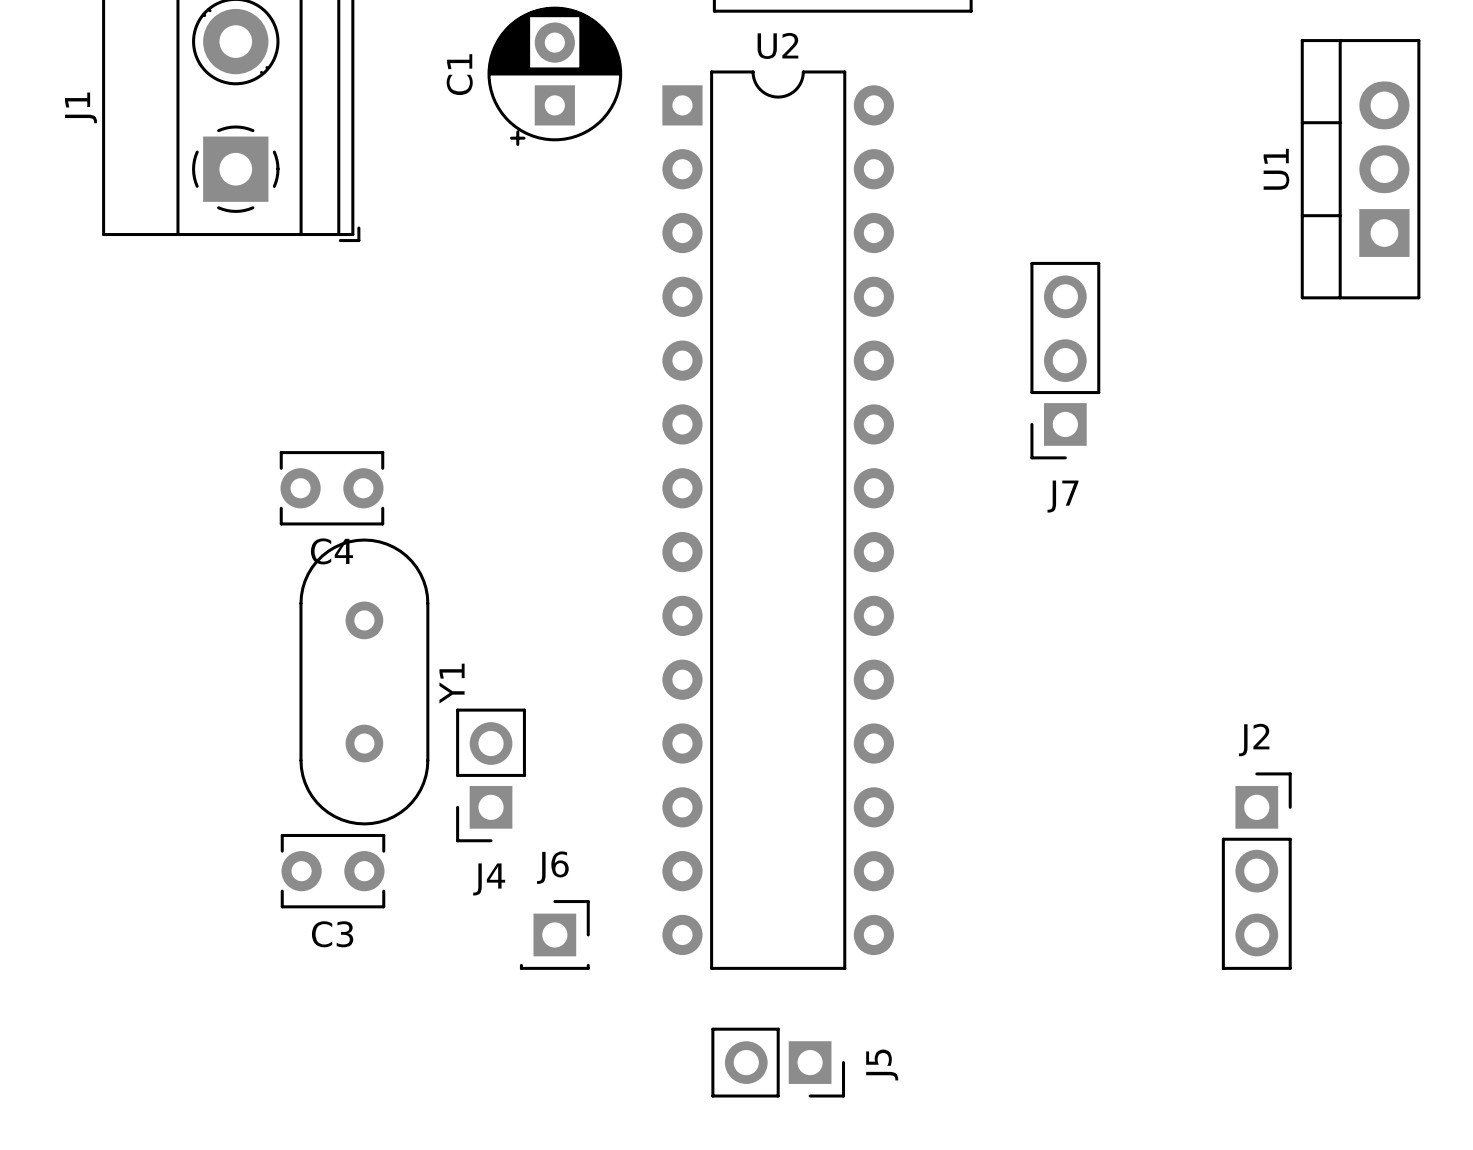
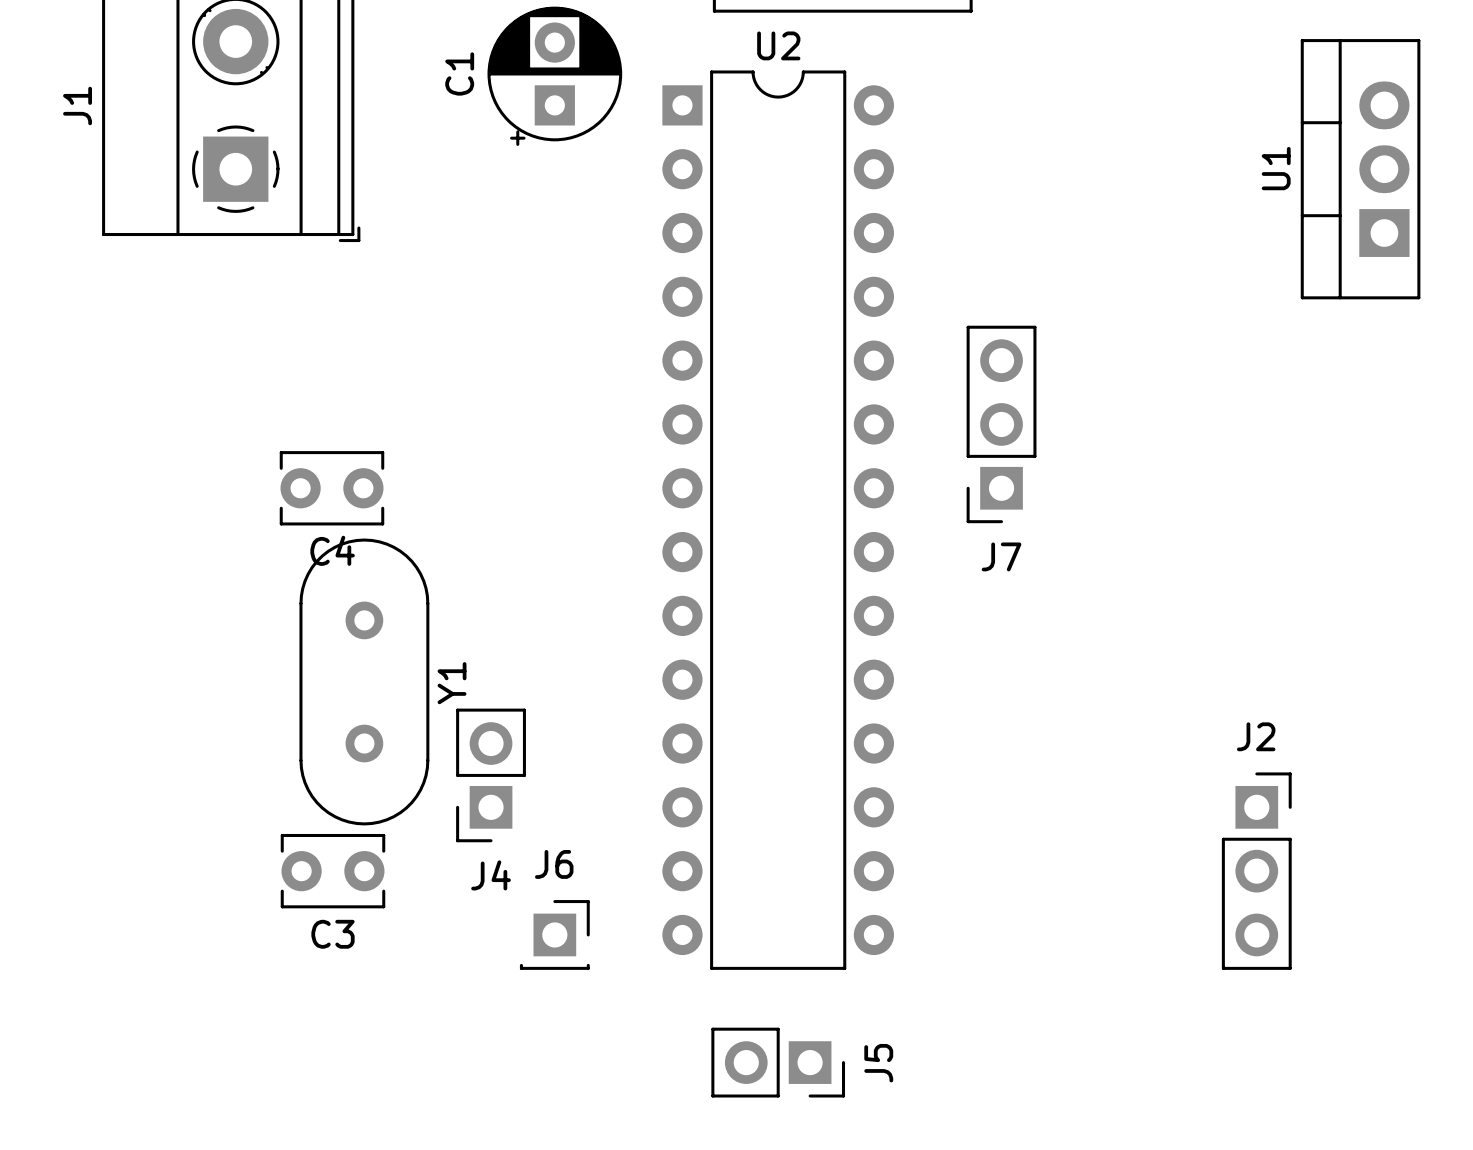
J7 position: (1065, 360) -> (1001, 424)

